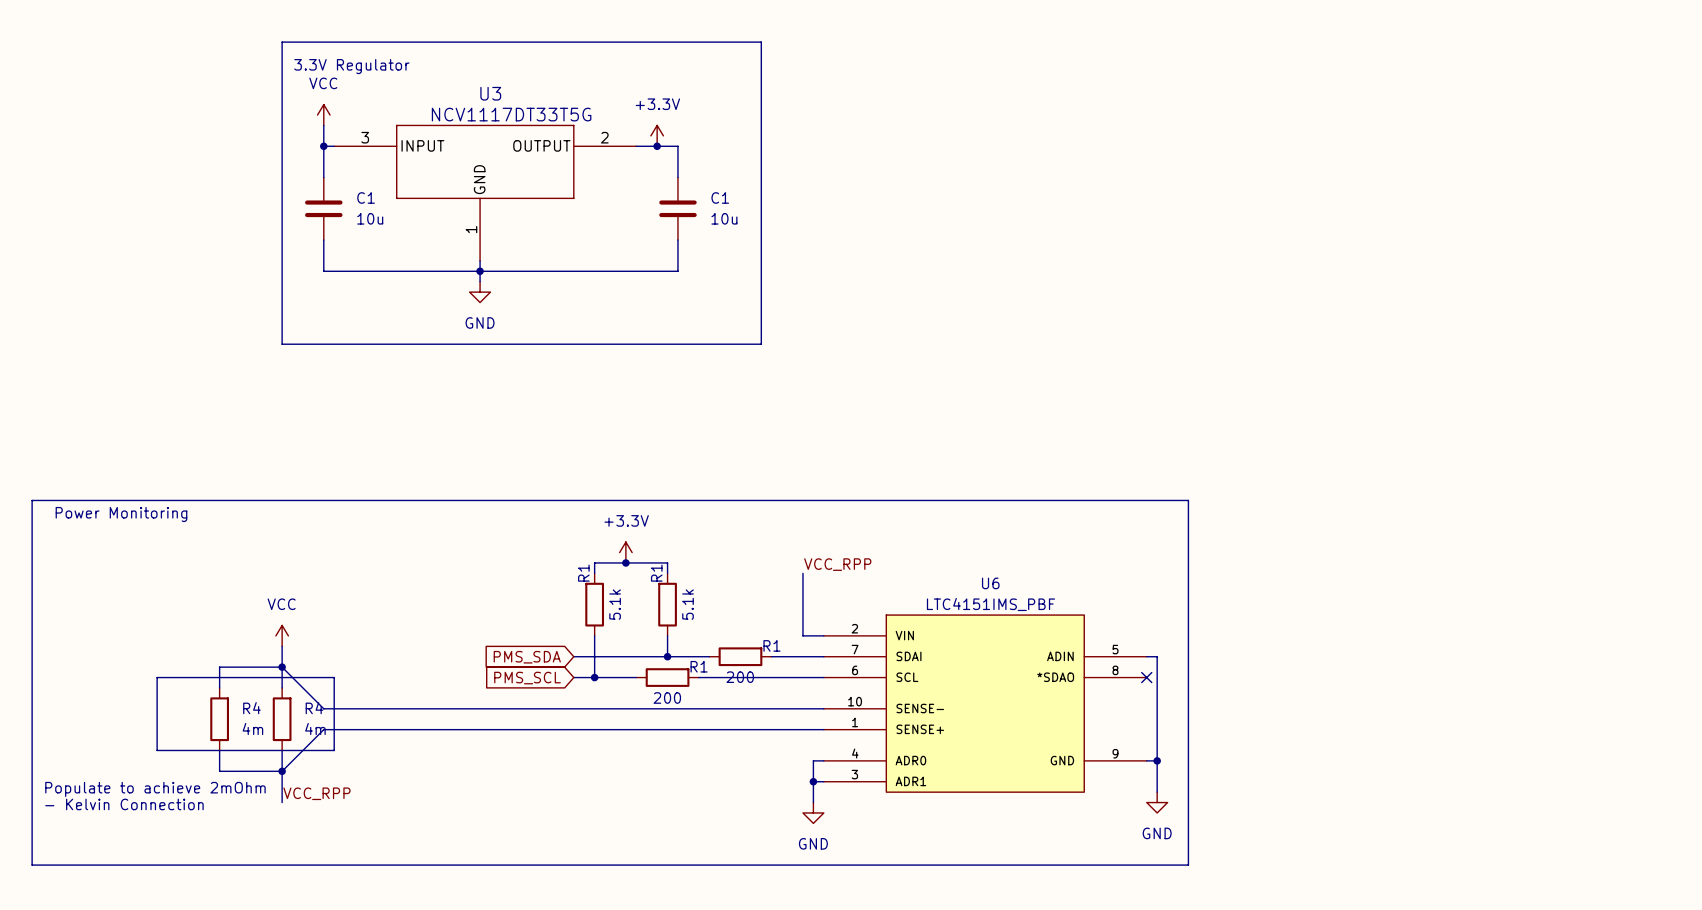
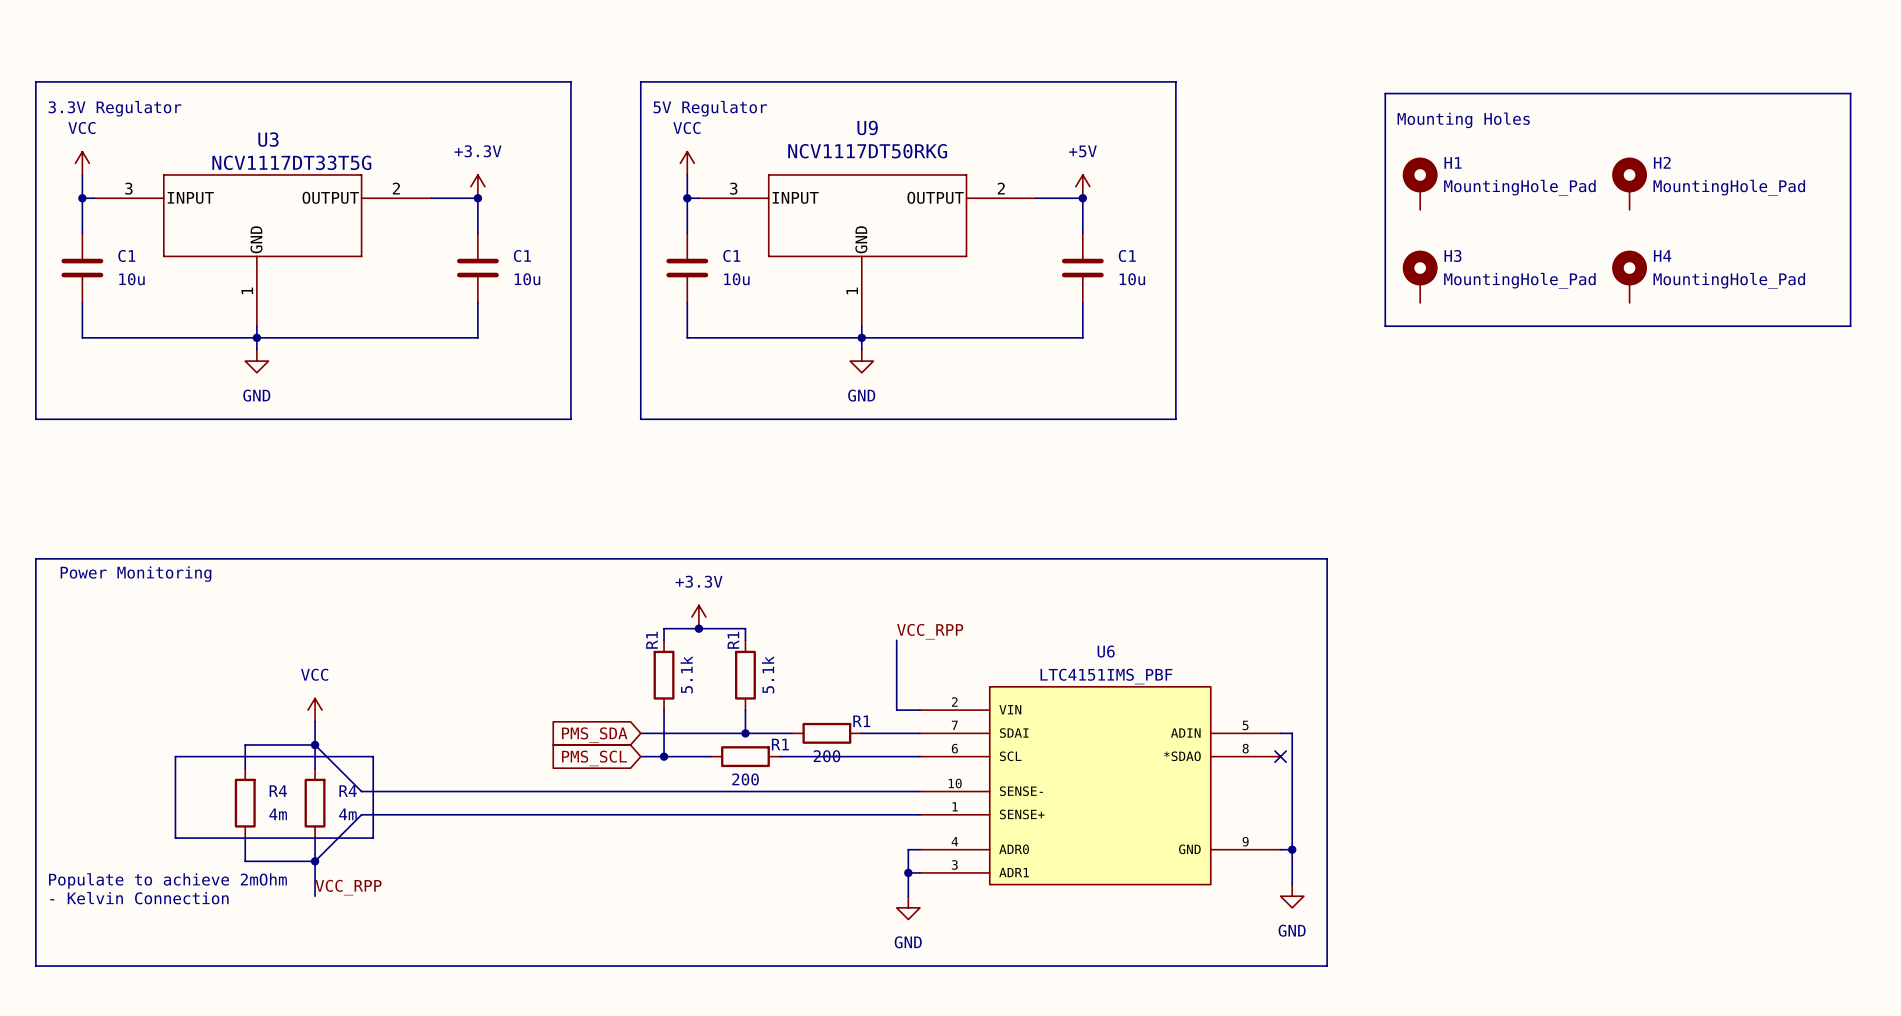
line: (282, 42) (761, 42) (761, 344) (282, 344) (282, 42) -> none
text: 3.3V Regulator (351, 66) -> none
line: none -> (35, 81) (570, 81) (570, 419) (35, 419) (35, 81)
line: none -> (640, 81) (1175, 81) (1175, 419) (640, 419) (640, 81)
line: none -> (1385, 93) (1850, 93) (1850, 326) (1385, 326) (1385, 93)
text: none -> 3.3V Regulator (114, 108)
text: none -> 5V Regulator (710, 108)
text: none -> Mounting Holes (1463, 120)
power symbol: VCC (323, 115) -> none
wire: (323, 125) (323, 177) -> none
power symbol: +3.3V (657, 135) -> none
power symbol: none -> VCC (82, 163)
wire: (323, 146) (334, 146) -> none
junction: (323, 146) -> none
power symbol: none -> VCC (687, 163)
wire: (636, 146) (677, 146) (677, 177) -> none
junction: (657, 146) -> none
wire: none -> (82, 174) (82, 233)
wire: none -> (687, 174) (687, 233)
H1: none -> MountingHole_Pad (1420, 183)
H2: none -> MountingHole_Pad (1629, 183)
power symbol: none -> +3.3V (477, 186)
power symbol: none -> +5V (1082, 186)
wire: none -> (82, 198) (94, 198)
junction: none -> (82, 198)
wire: none -> (431, 198) (477, 198) (477, 233)
junction: none -> (477, 198)
wire: none -> (687, 198) (698, 198)
junction: none -> (687, 198)
wire: none -> (1036, 198) (1082, 198) (1082, 233)
junction: none -> (1082, 198)
U3 position: (485, 192) -> (262, 250)
C1 position: (323, 208) -> (477, 268)
C1 position: (677, 208) -> (687, 268)
U9: none -> NCV1117DT50RKG (867, 250)
C1: none -> 10u (82, 268)
wire: (323, 240) (323, 271) (677, 271) (677, 240) -> none
C1: none -> 10u (1082, 268)
H3: none -> MountingHole_Pad (1420, 276)
H4: none -> MountingHole_Pad (1629, 276)
wire: (480, 260) (480, 281) -> none
wire: none -> (82, 302) (82, 337) (477, 337) (477, 302)
junction: (480, 271) -> none
wire: none -> (687, 302) (687, 337) (1082, 337) (1082, 302)
wire: none -> (256, 326) (256, 349)
power symbol: GND (480, 292) -> none
wire: none -> (861, 326) (861, 349)
junction: none -> (256, 337)
junction: none -> (861, 337)
power symbol: none -> GND (256, 361)
power symbol: none -> GND (861, 361)

